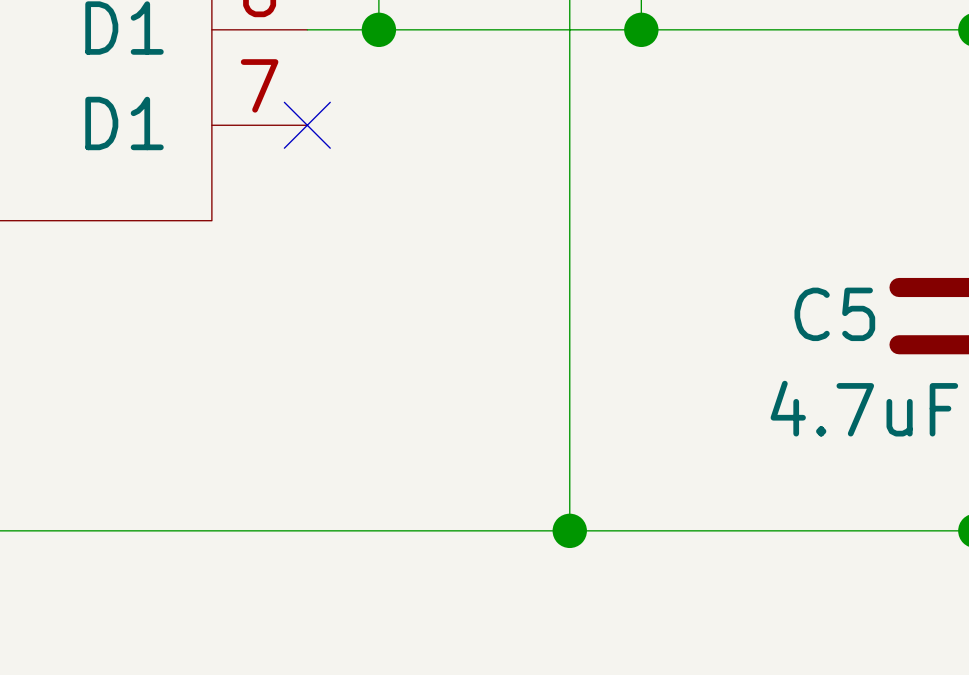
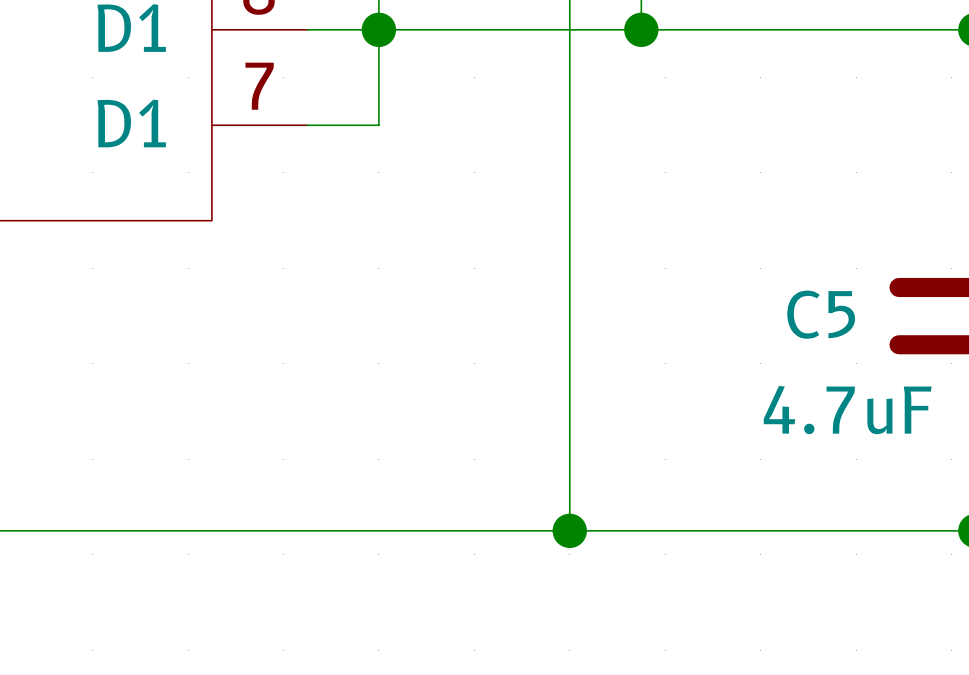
wire: none -> (378, 29) (378, 125) (307, 125)
no-connect mark: (307, 125) -> none

